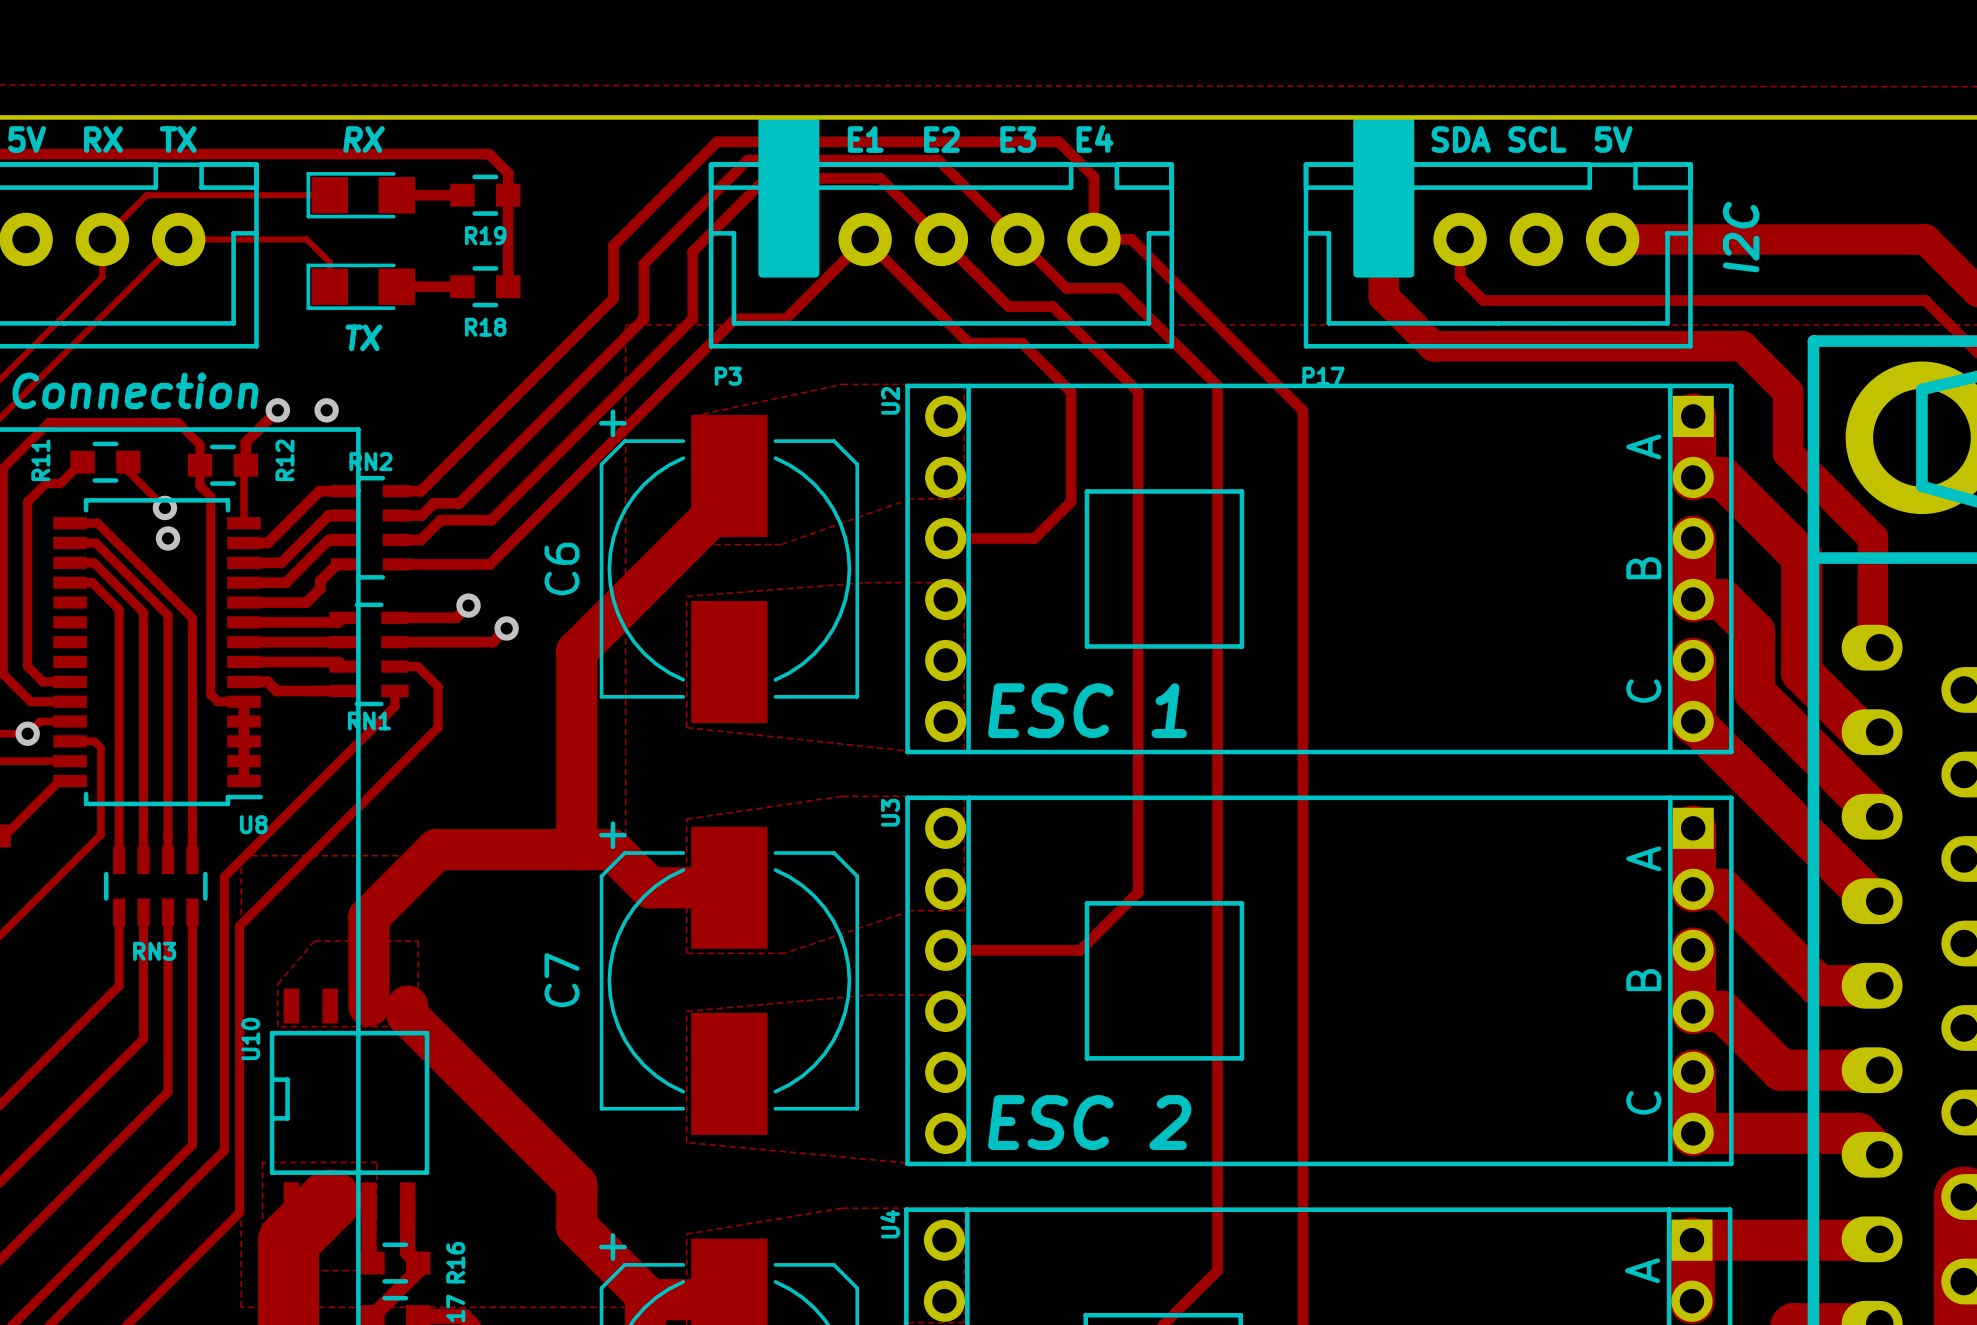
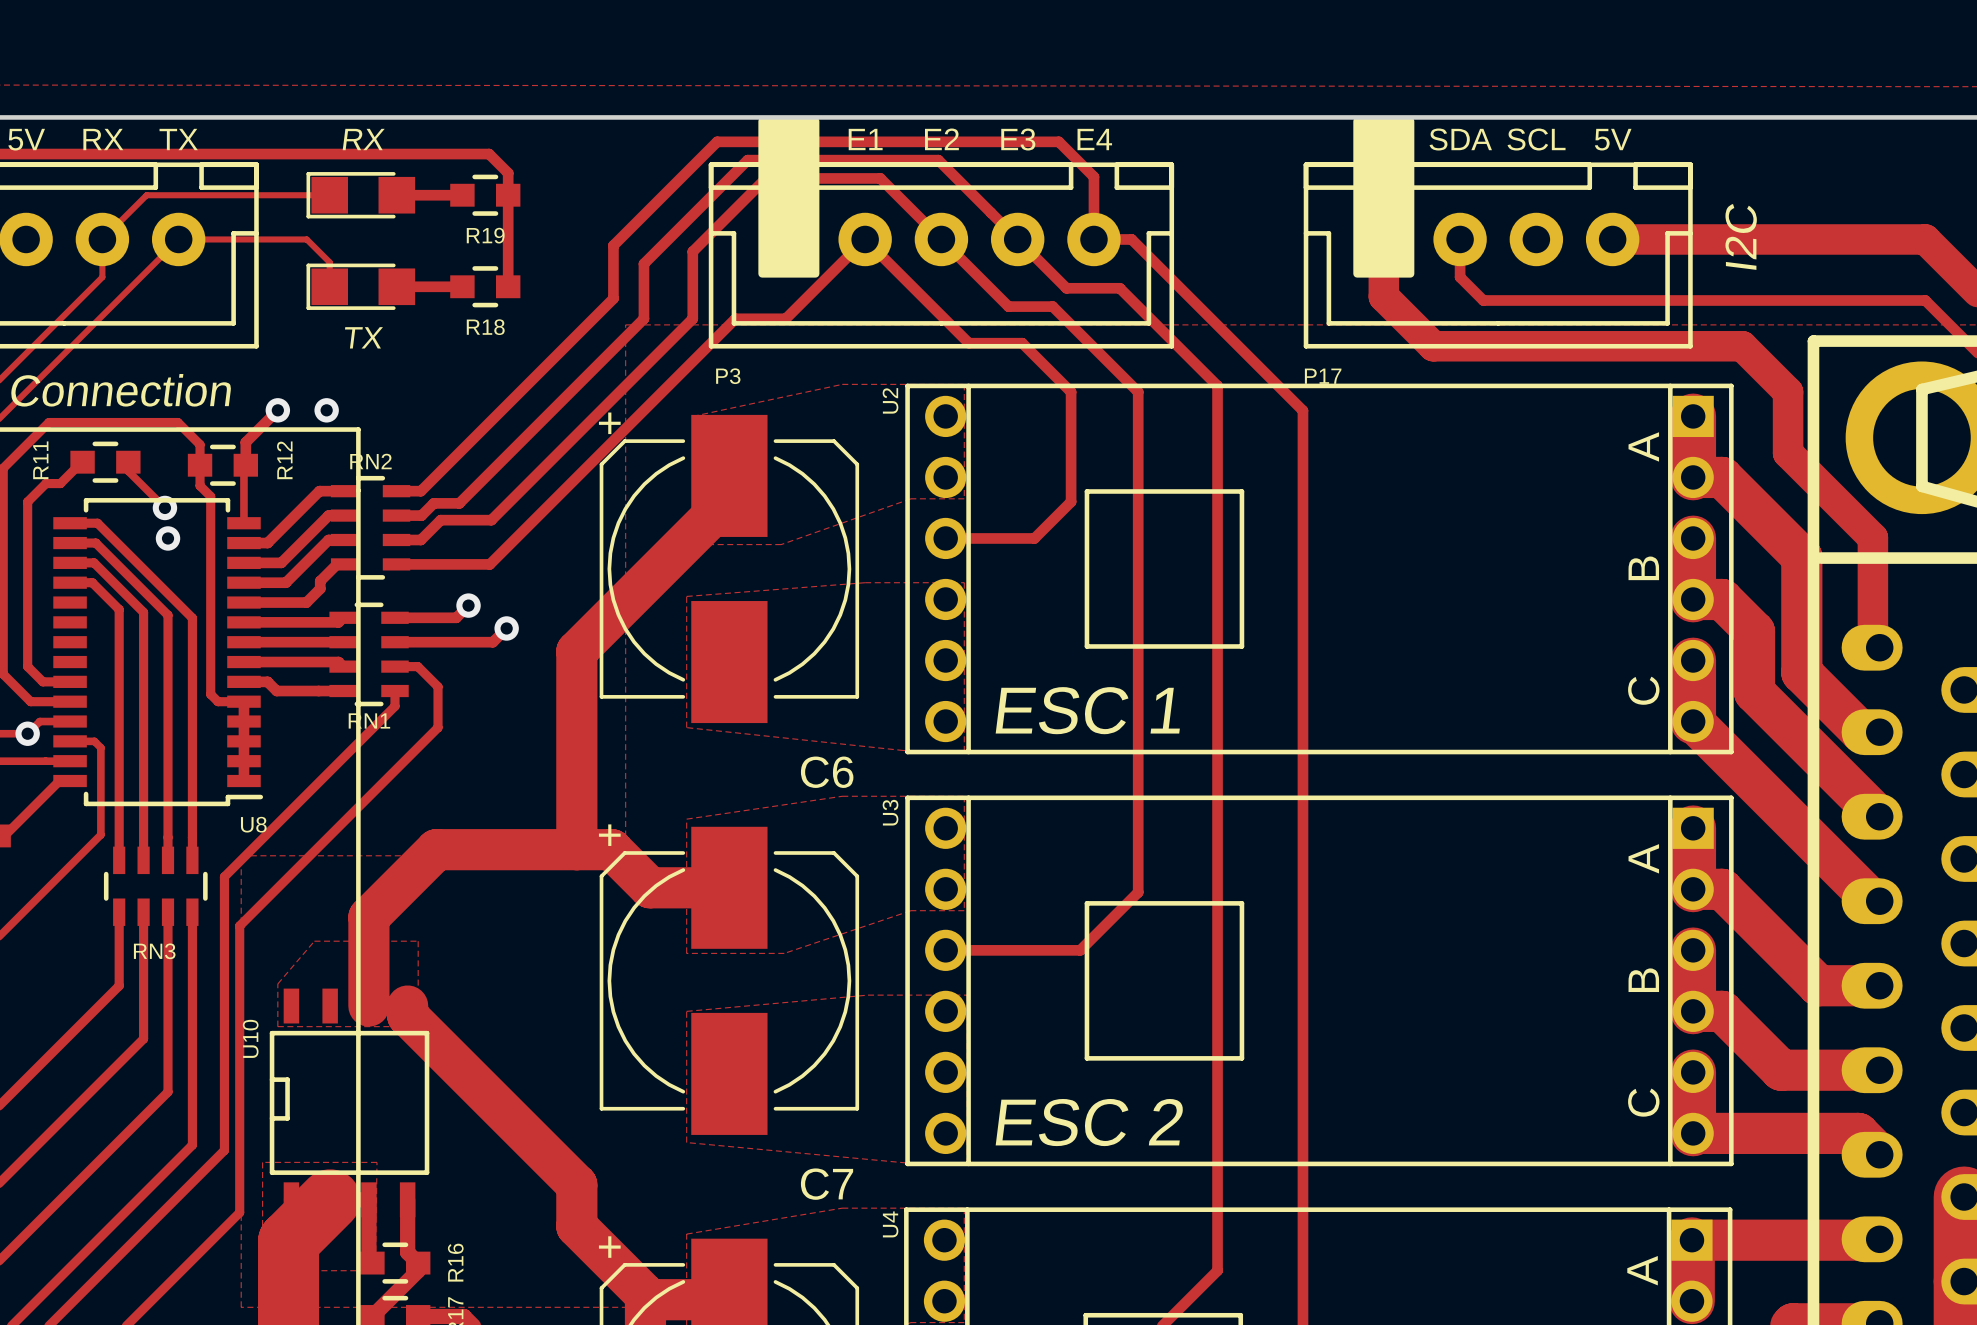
C6 name rotation: 0° (562, 568) -> 90° clockwise (827, 772)
C6 name position: C6 (562, 568) -> C6 (827, 772)
C7 name rotation: 0° (562, 980) -> 90° clockwise (827, 1184)
C7 name position: C7 (562, 980) -> C7 (827, 1184)

